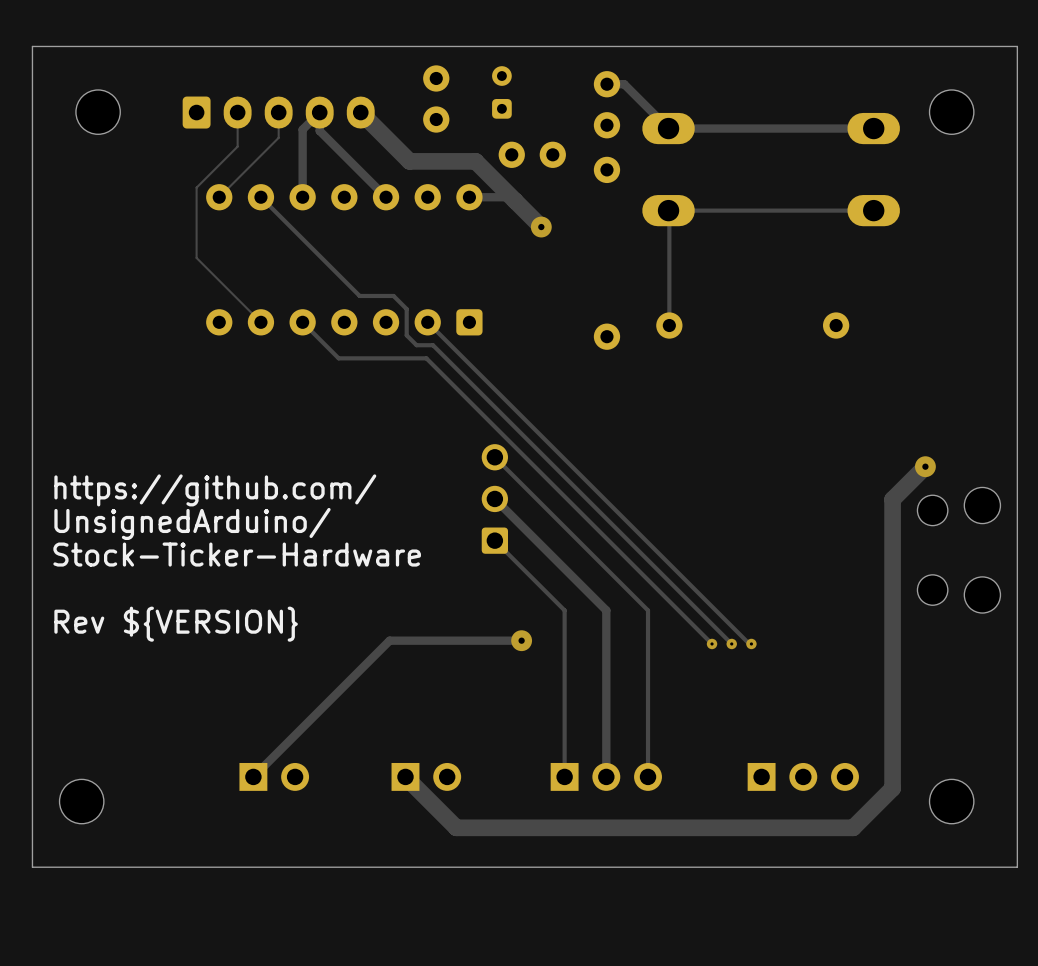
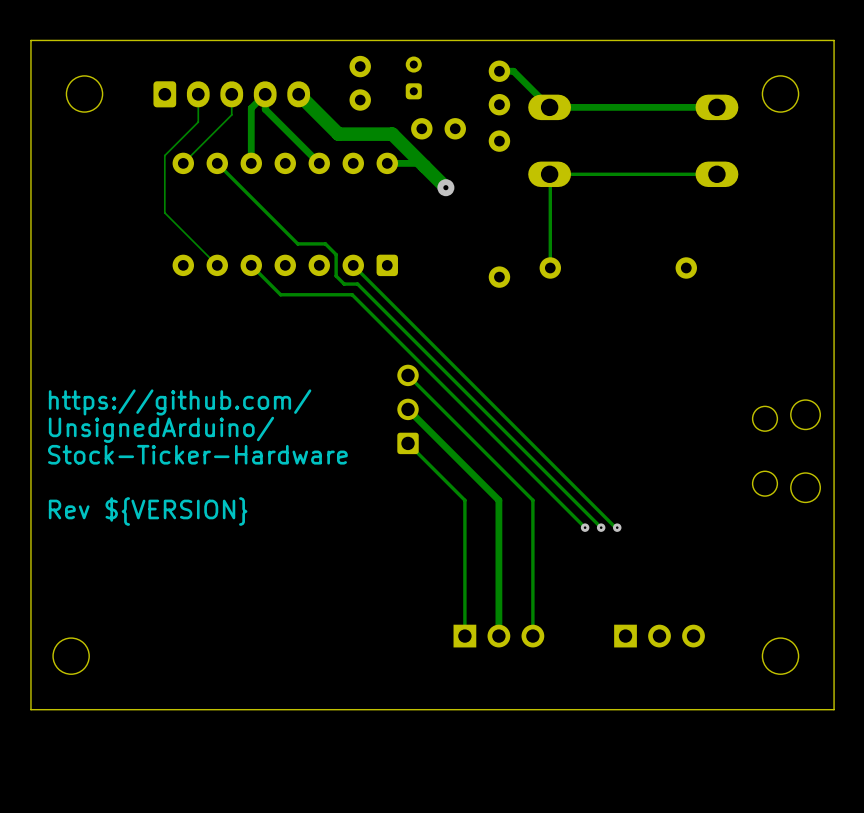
track: (925, 466) (892, 499) (892, 788) (853, 827) (456, 827) (405, 776) -> none
via: (925, 466) -> none
track: (521, 640) (389, 640) (253, 776) -> none
via: (521, 640) -> none
part: (274, 776) -> none
part: (426, 776) -> none

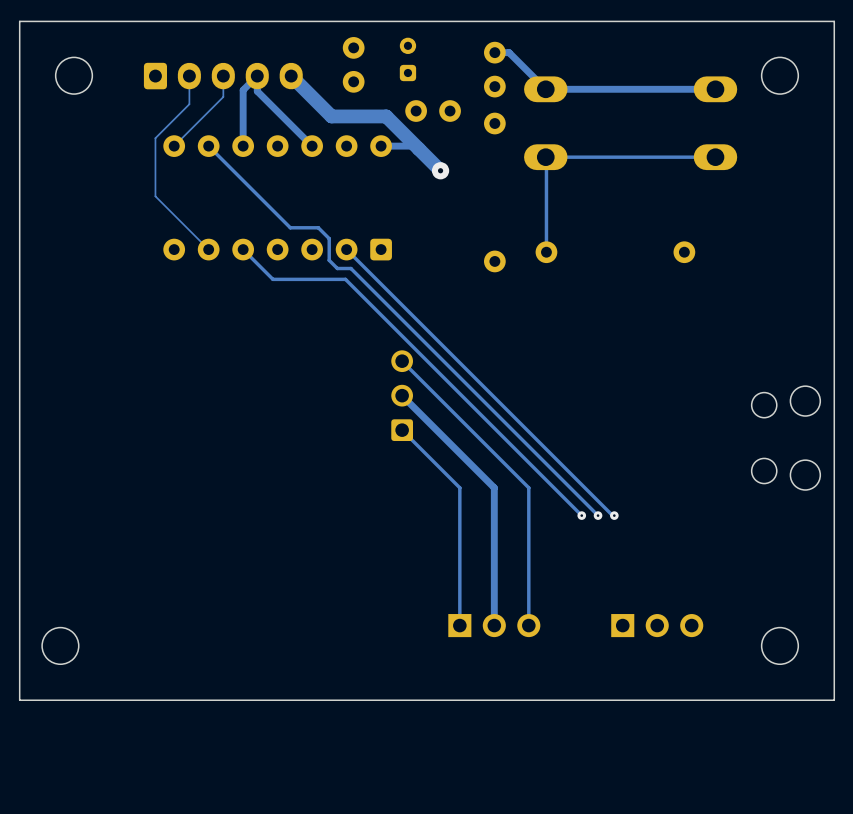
text: https://github.com/ (180, 402) -> none
text: UnsignedArduino/ (161, 429) -> none
text: Stock-Ticker-Hardware (197, 454) -> none
text: Rev ${VERSION} (148, 511) -> none

